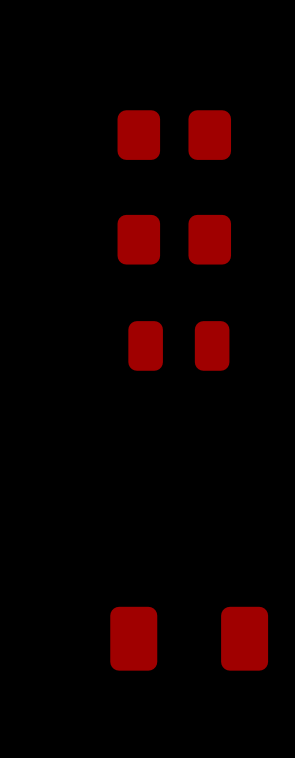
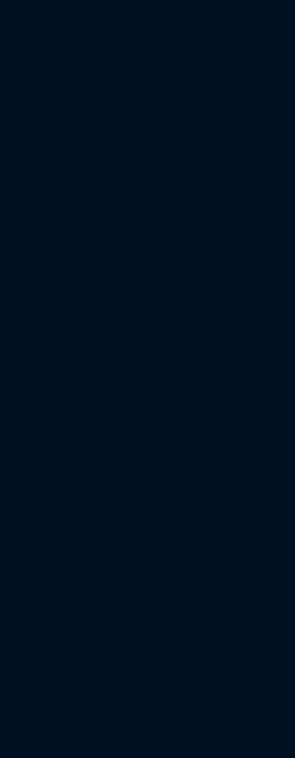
part: (174, 135) -> none
part: (174, 239) -> none
part: (178, 345) -> none
part: (189, 638) -> none

